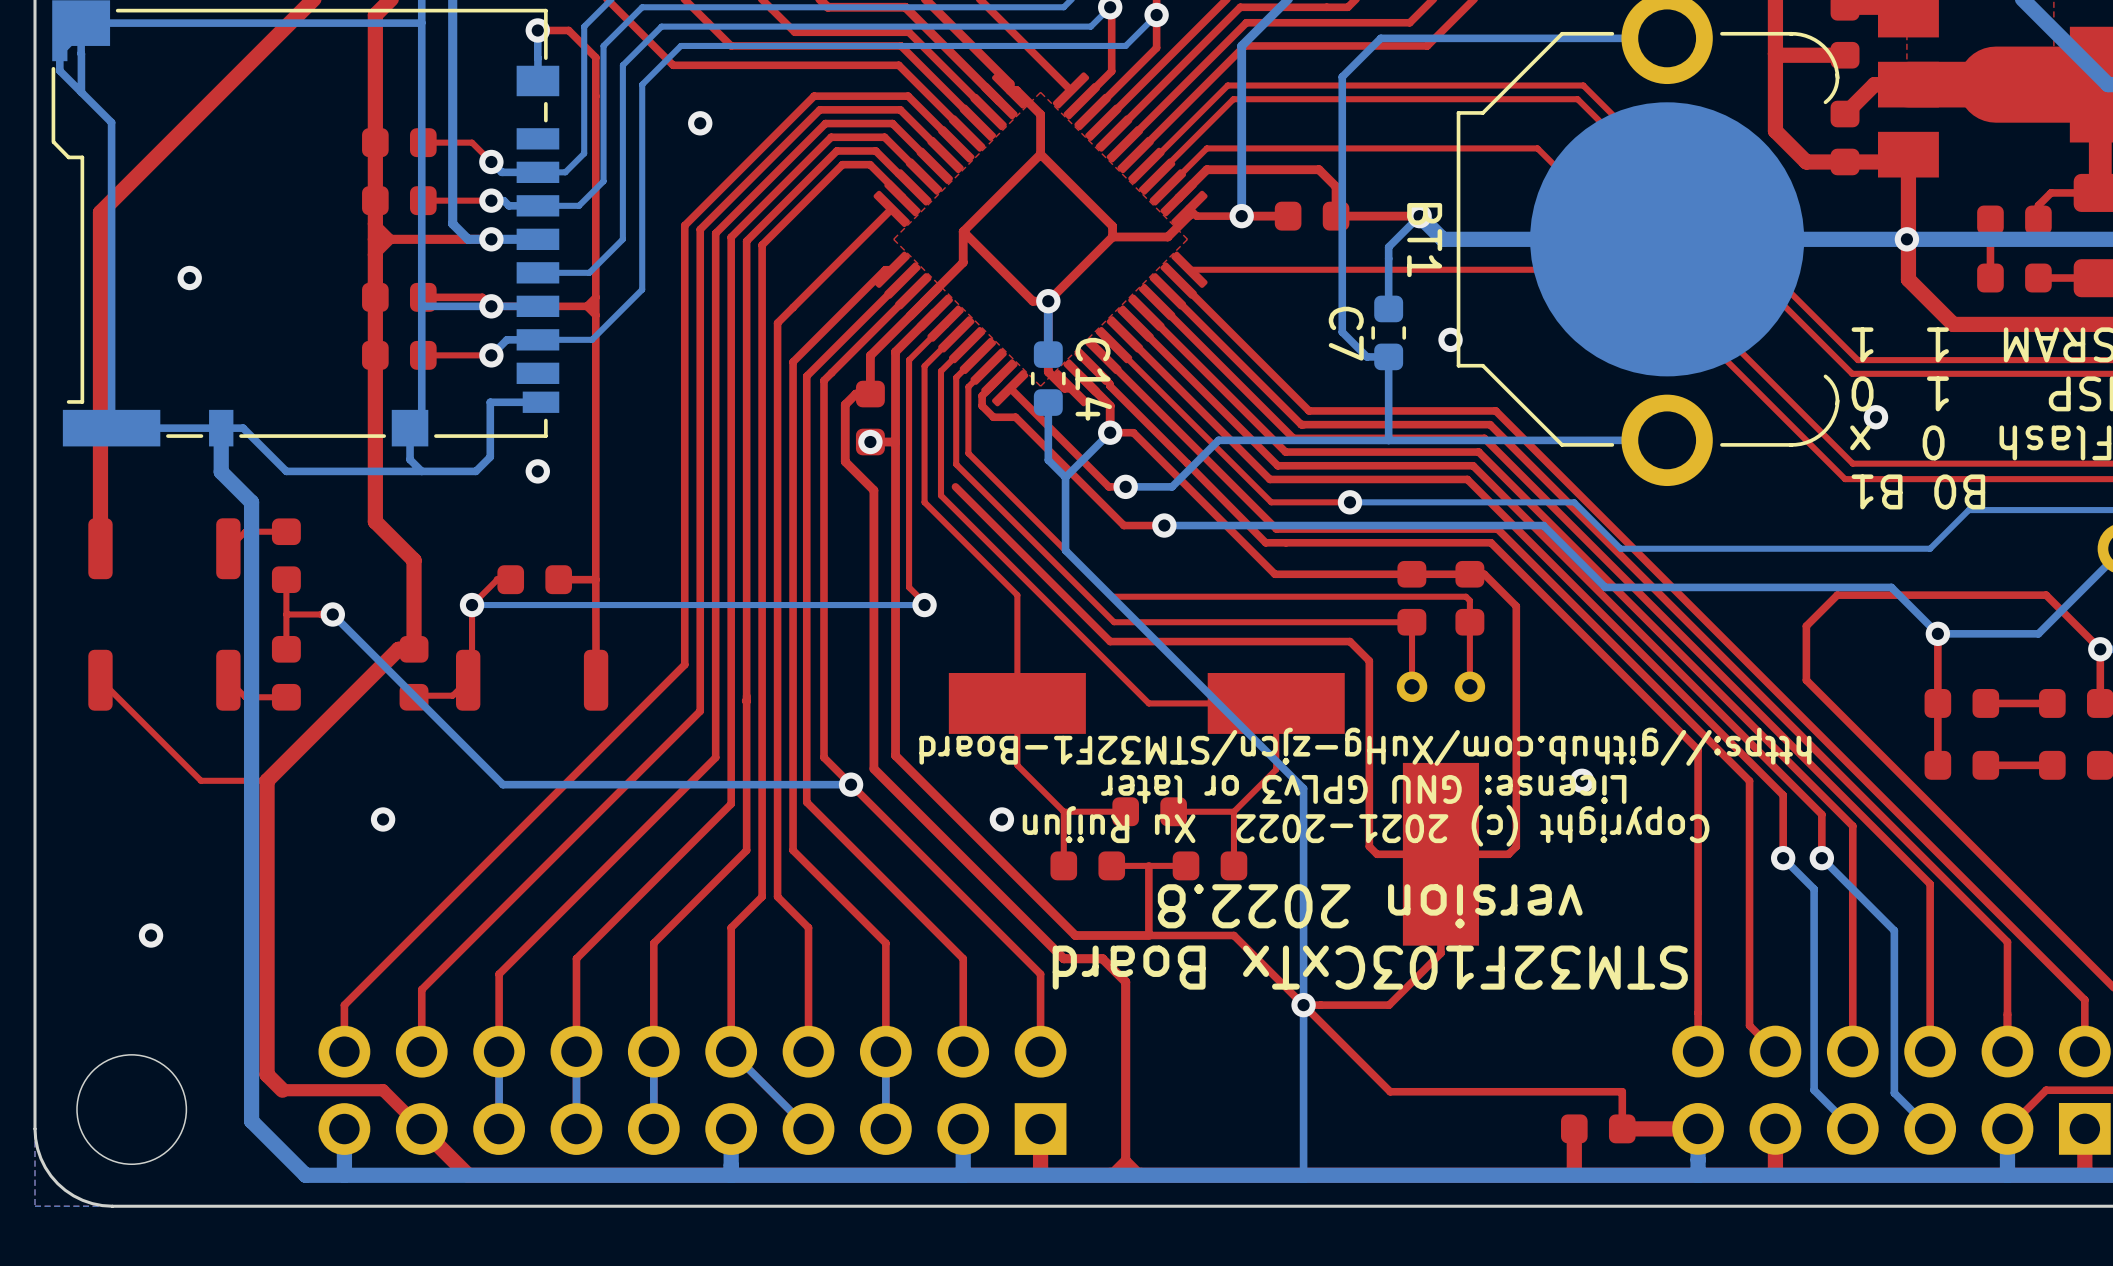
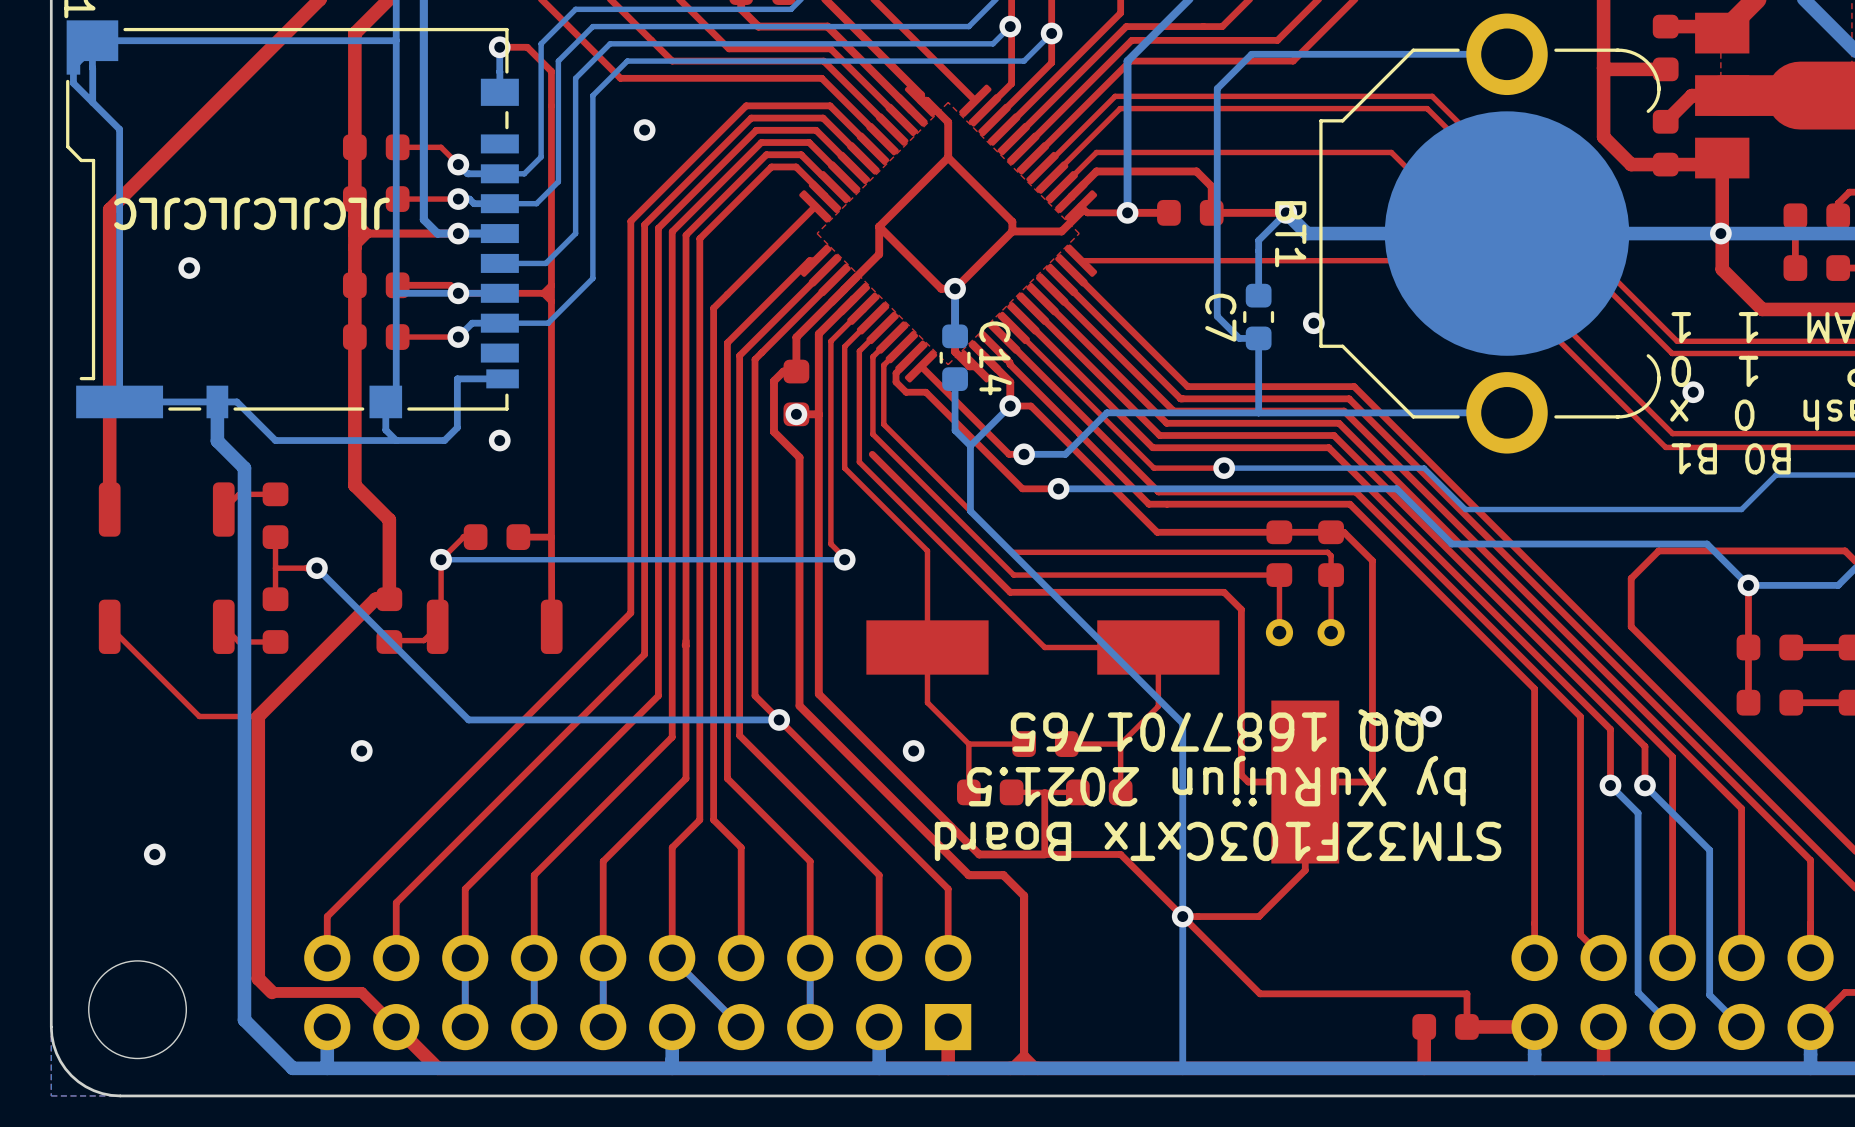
text: none -> JLCJLCJLCJLC (252, 213)
text: https://github.com/XuHg-zjcn/STM32F1-Board (1365, 746) -> none
text: License: GNU GPLv3 or later (1363, 789) -> none
text: none -> QQ 1687701765 (1217, 730)
text: Copyright (c) 2021-2022 Xu Ruijun (1366, 825) -> none
text: none -> by XuRuijun 2021.5 (1216, 781)
text: version 2022.8 (1370, 906) -> none
text position: STM32F103CxTx Board (1370, 967) -> STM32F103CxTx Board (1218, 841)

